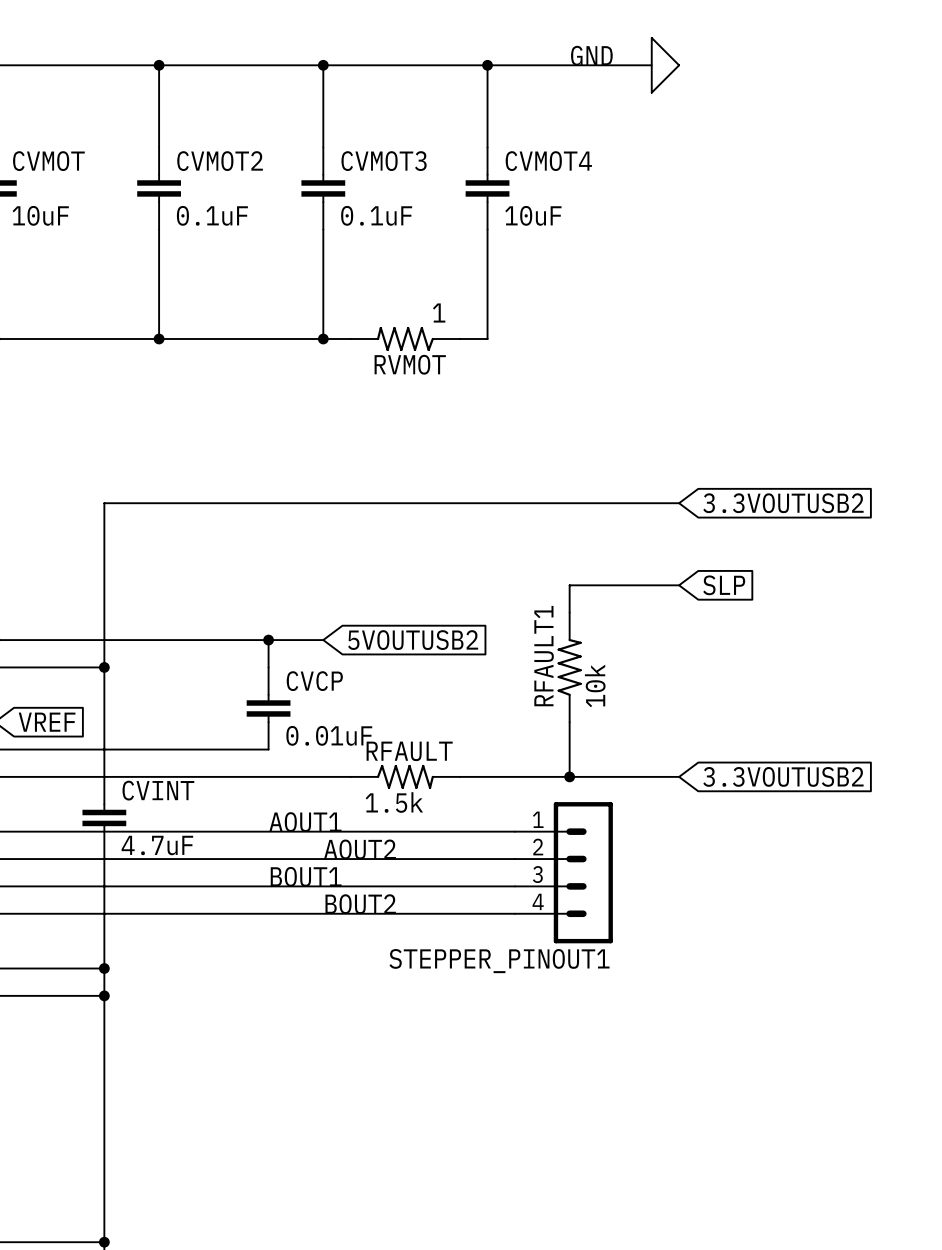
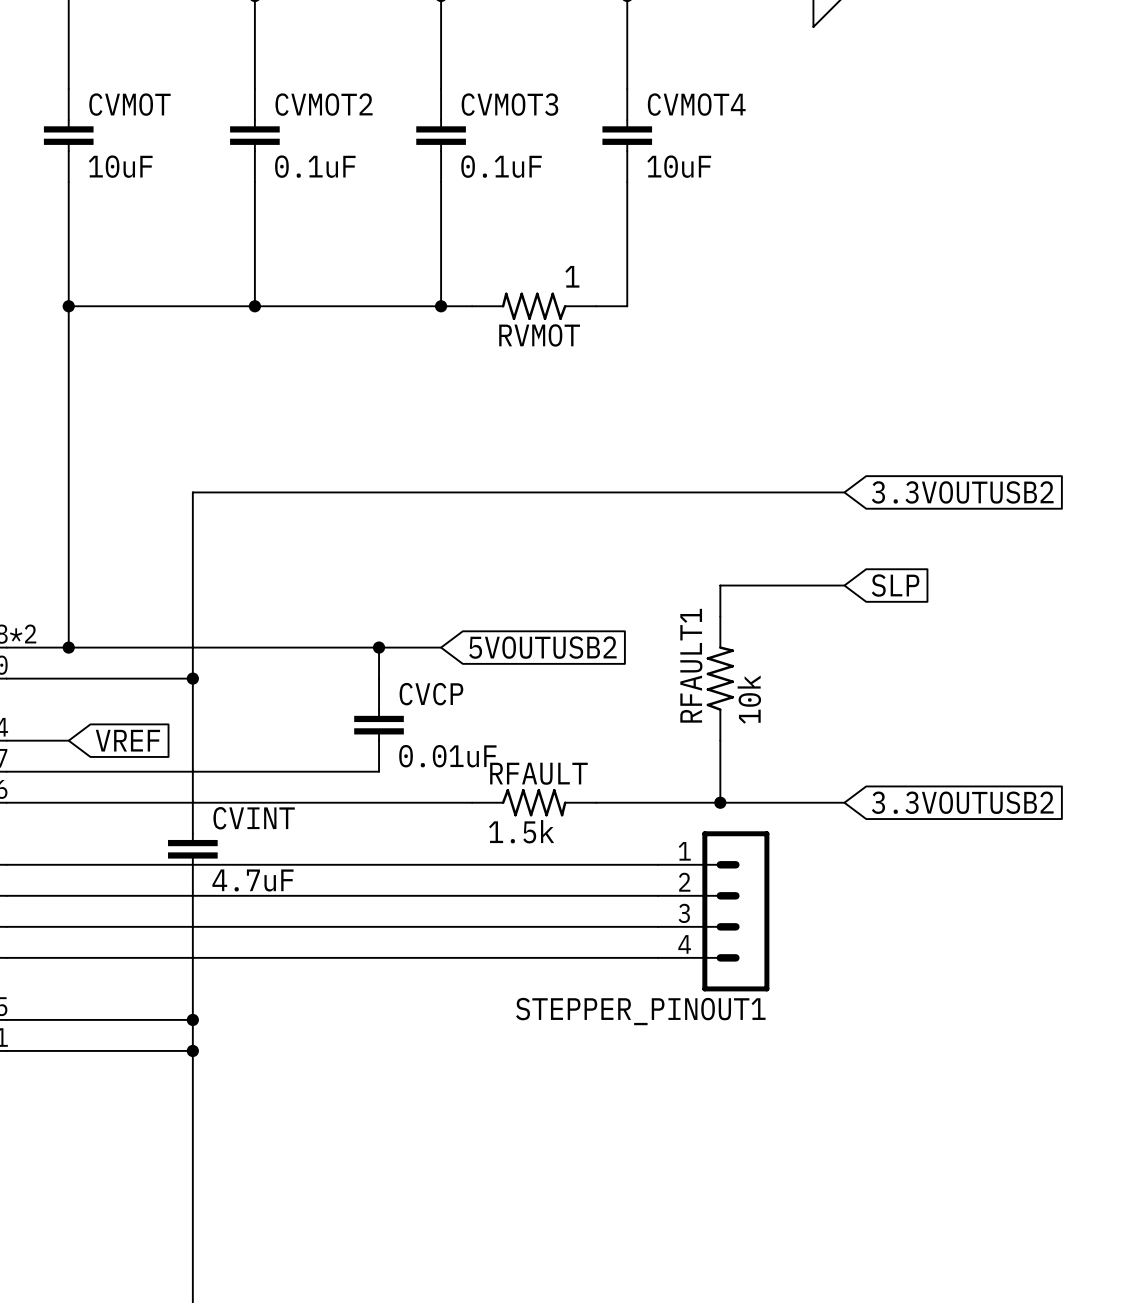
label: AOUT1 (305, 822) -> none
label: AOUT2 (359, 849) -> none
label: BOUT1 (306, 876) -> none
label: BOUT2 (360, 904) -> none

